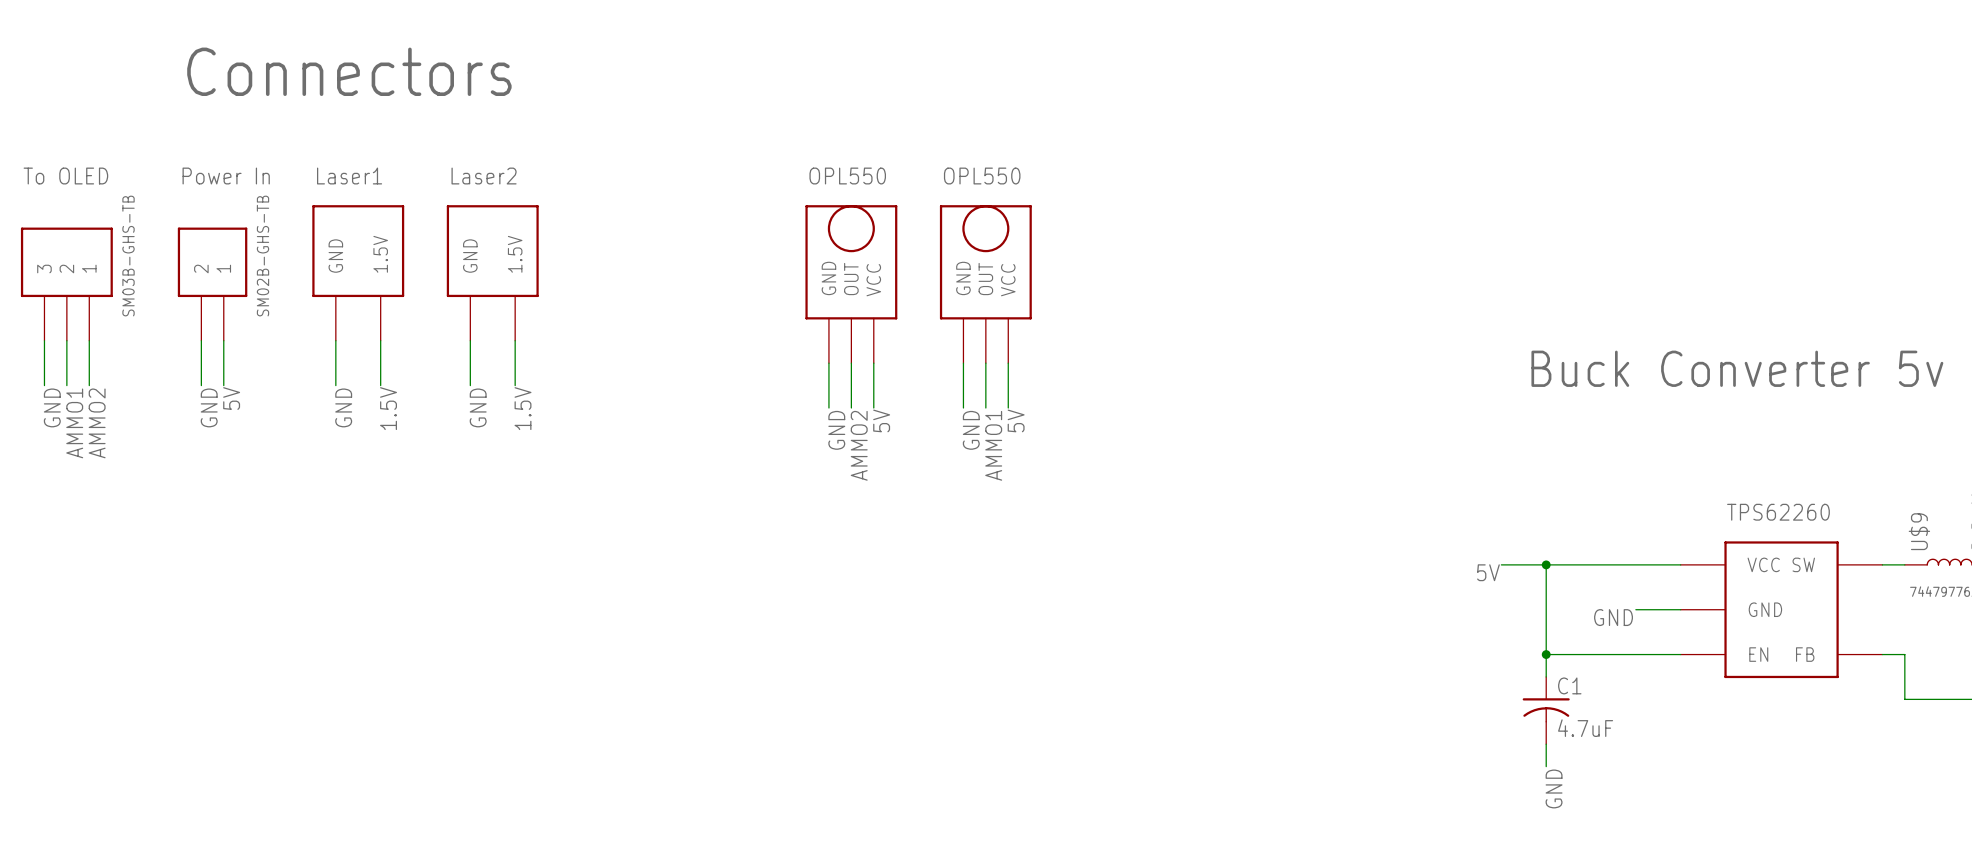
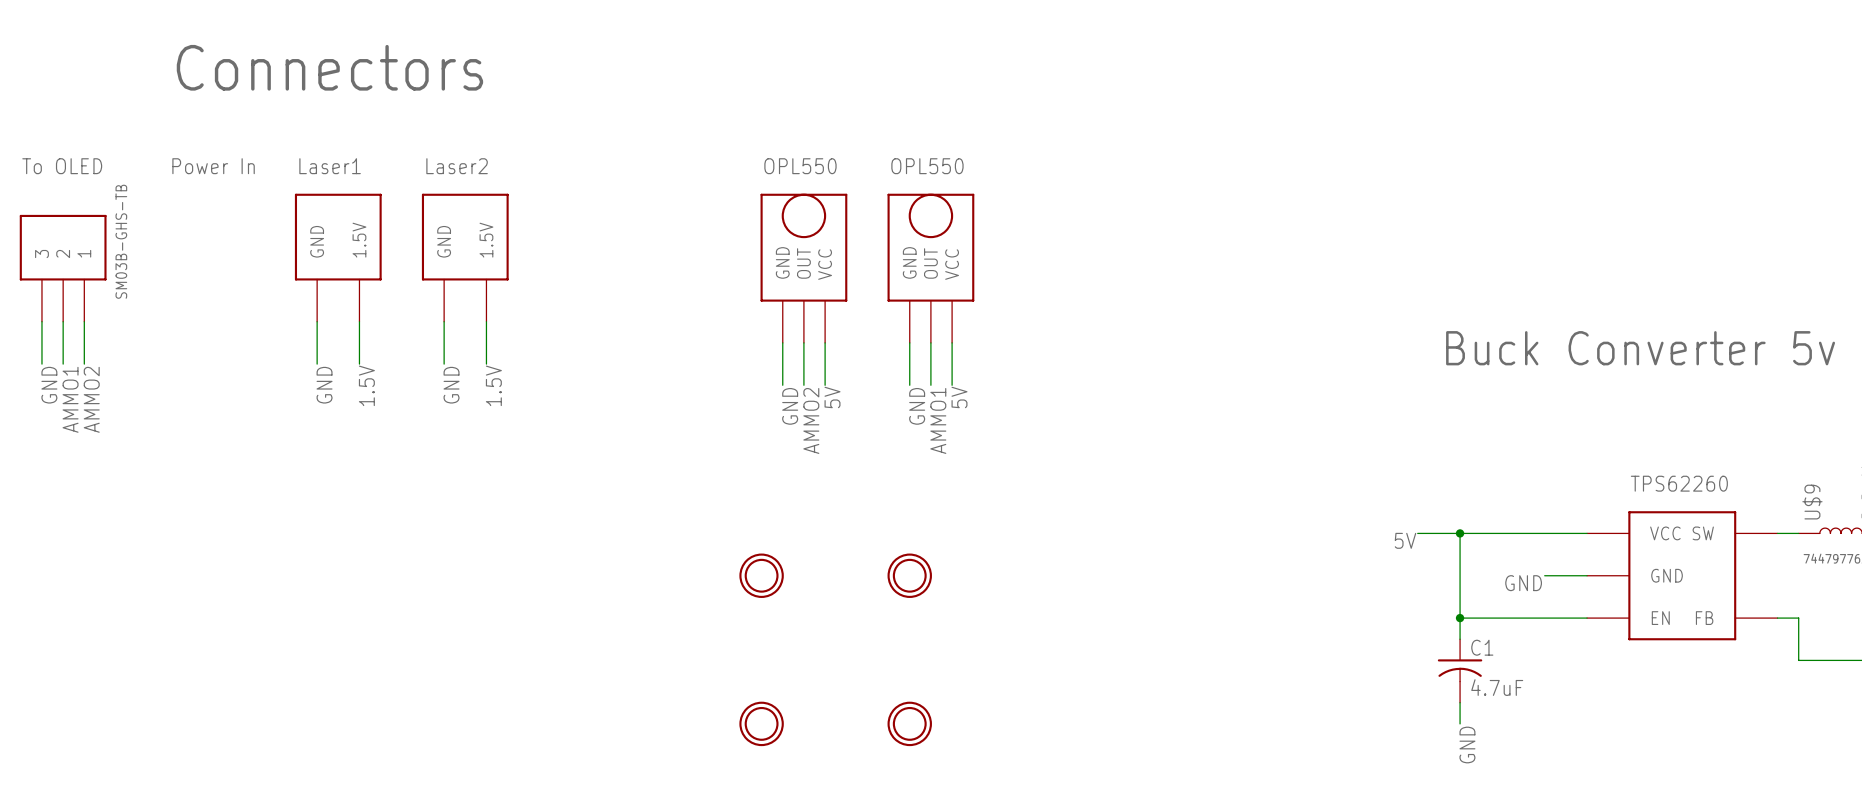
part: (212, 284) -> none
wire: (201, 340) (201, 385) -> none
wire: (223, 340) (223, 385) -> none
label: 5V (231, 398) -> none
label: GND (209, 407) -> none
part: none -> (761, 575)
part: none -> (909, 575)
part: none -> (761, 723)
part: none -> (909, 723)

